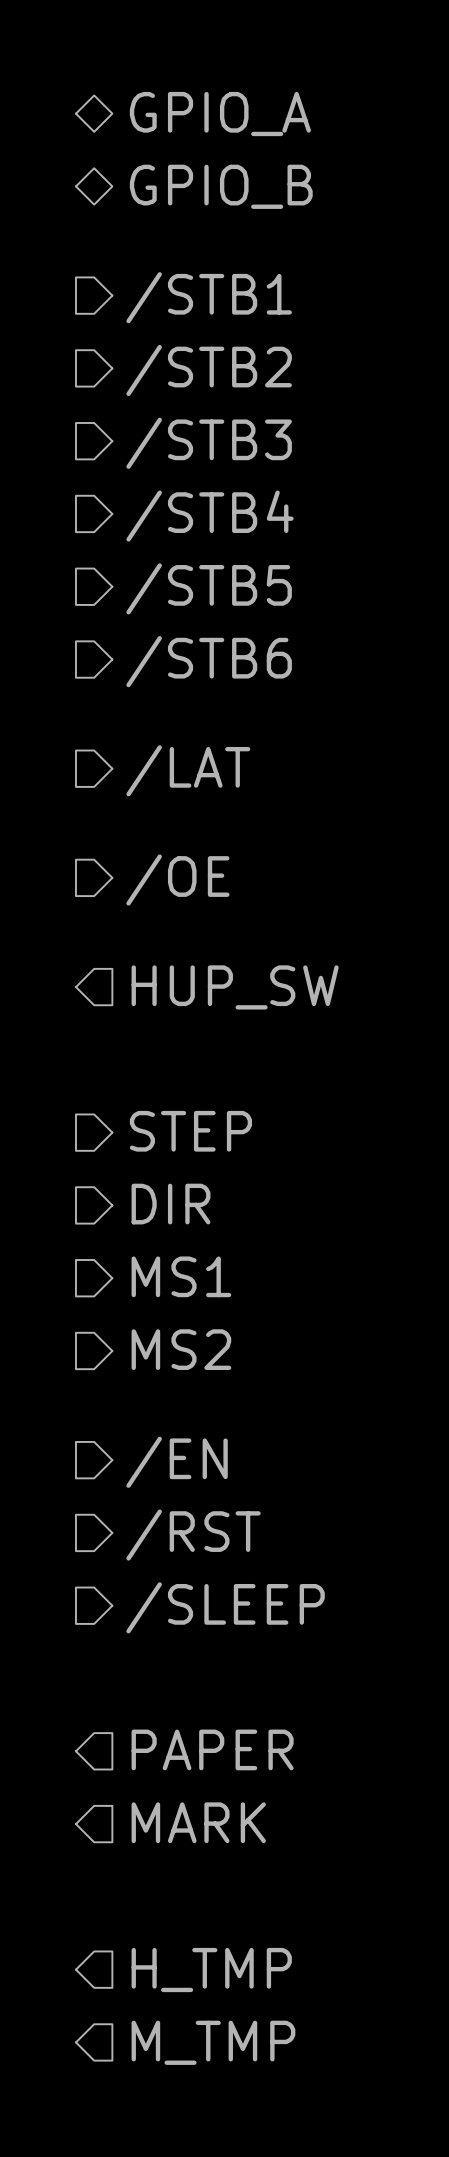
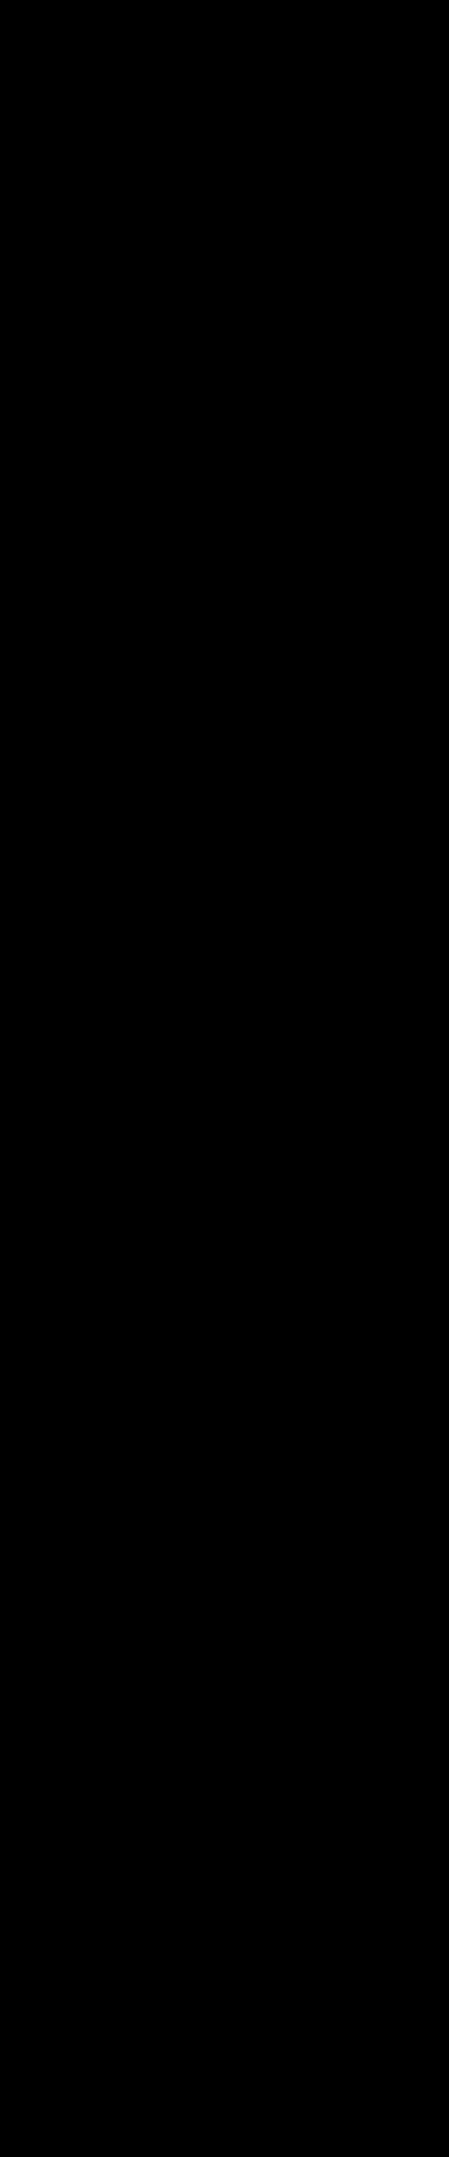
hierarchical label: GPIO_A (220, 114) -> none
hierarchical label: GPIO_B (221, 186) -> none
hierarchical label: /STB1 (209, 297) -> none
hierarchical label: /STB2 (209, 370) -> none
hierarchical label: /STB3 (209, 443) -> none
hierarchical label: /STB4 (209, 516) -> none
hierarchical label: /STB5 (209, 588) -> none
hierarchical label: /STB6 (209, 661) -> none
hierarchical label: /LAT (188, 770) -> none
hierarchical label: /OE (177, 879) -> none
hierarchical label: HUP_SW (235, 987) -> none
hierarchical label: STEP (190, 1131) -> none
hierarchical label: DIR (171, 1204) -> none
hierarchical label: MS1 (181, 1276) -> none
hierarchical label: MS2 (181, 1349) -> none
hierarchical label: /EN (177, 1462) -> none
hierarchical label: /RST (193, 1535) -> none
hierarchical label: /SLEEP (225, 1607) -> none
hierarchical label: PAPER (212, 1749) -> none
hierarchical label: MARK (198, 1822) -> none
hierarchical label: H_TMP (211, 1970) -> none
hierarchical label: M_TMP (213, 2042) -> none

